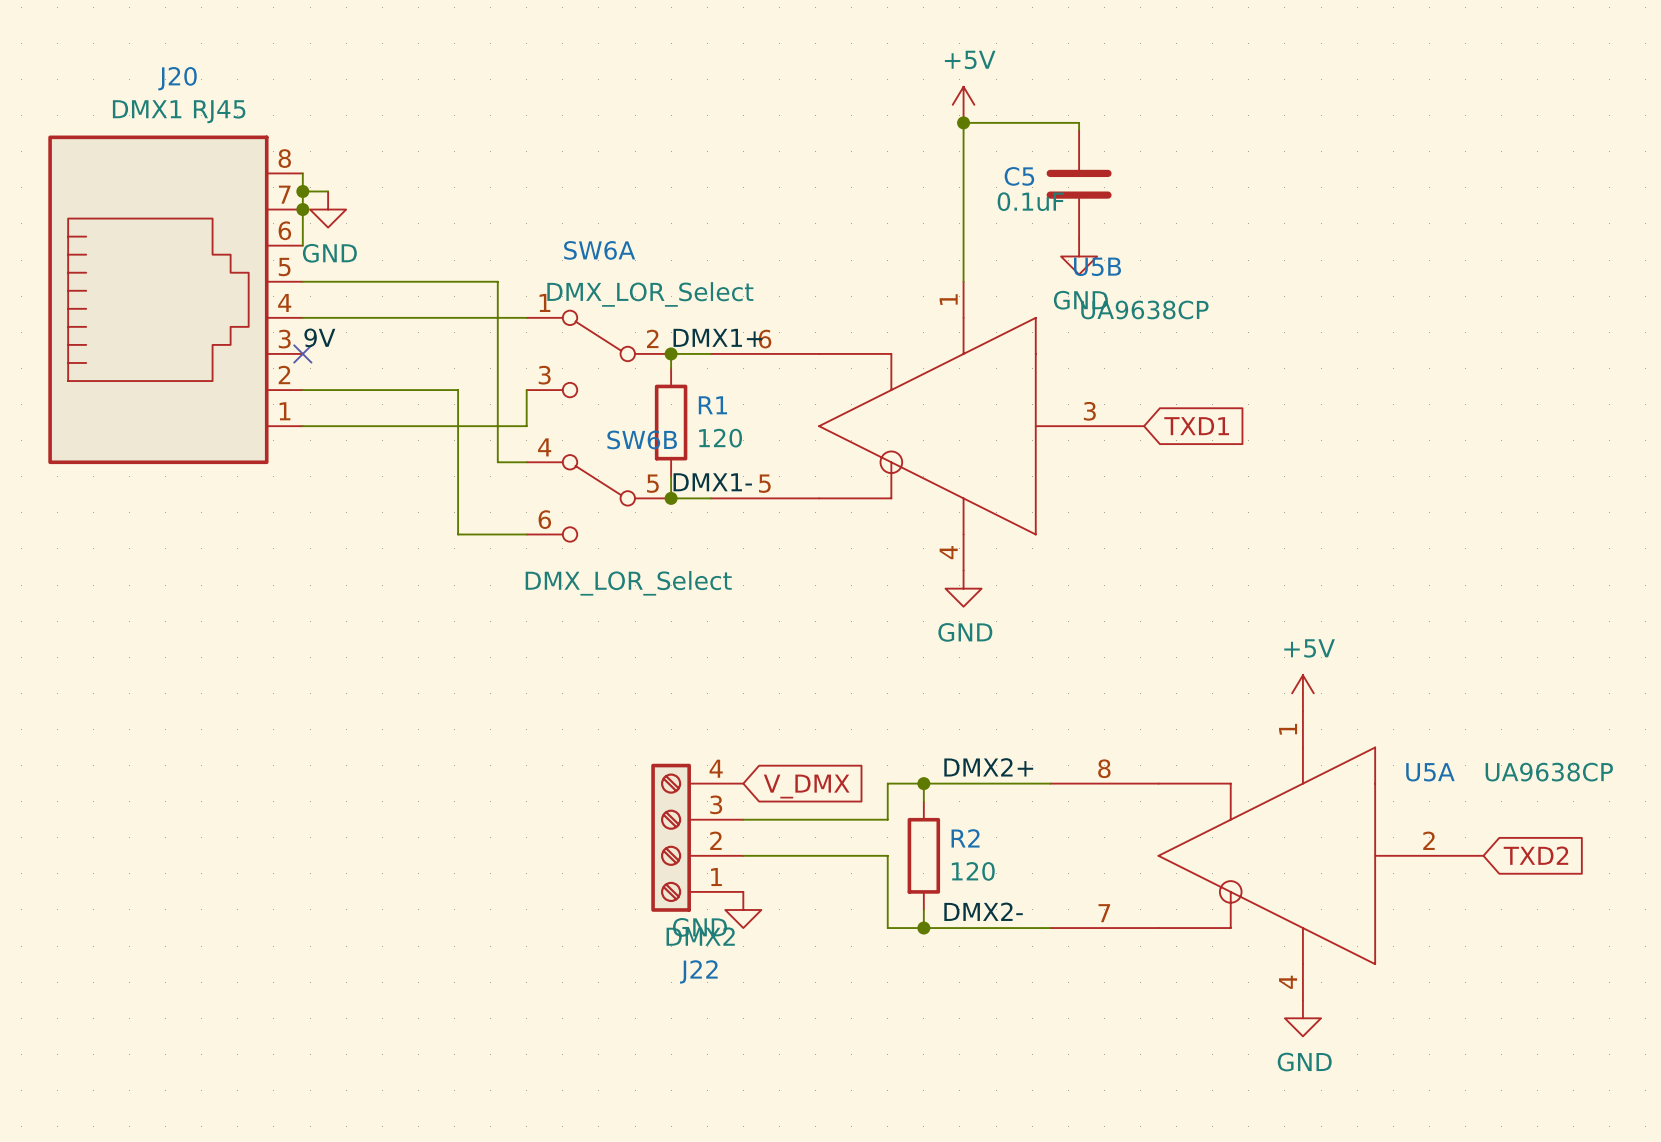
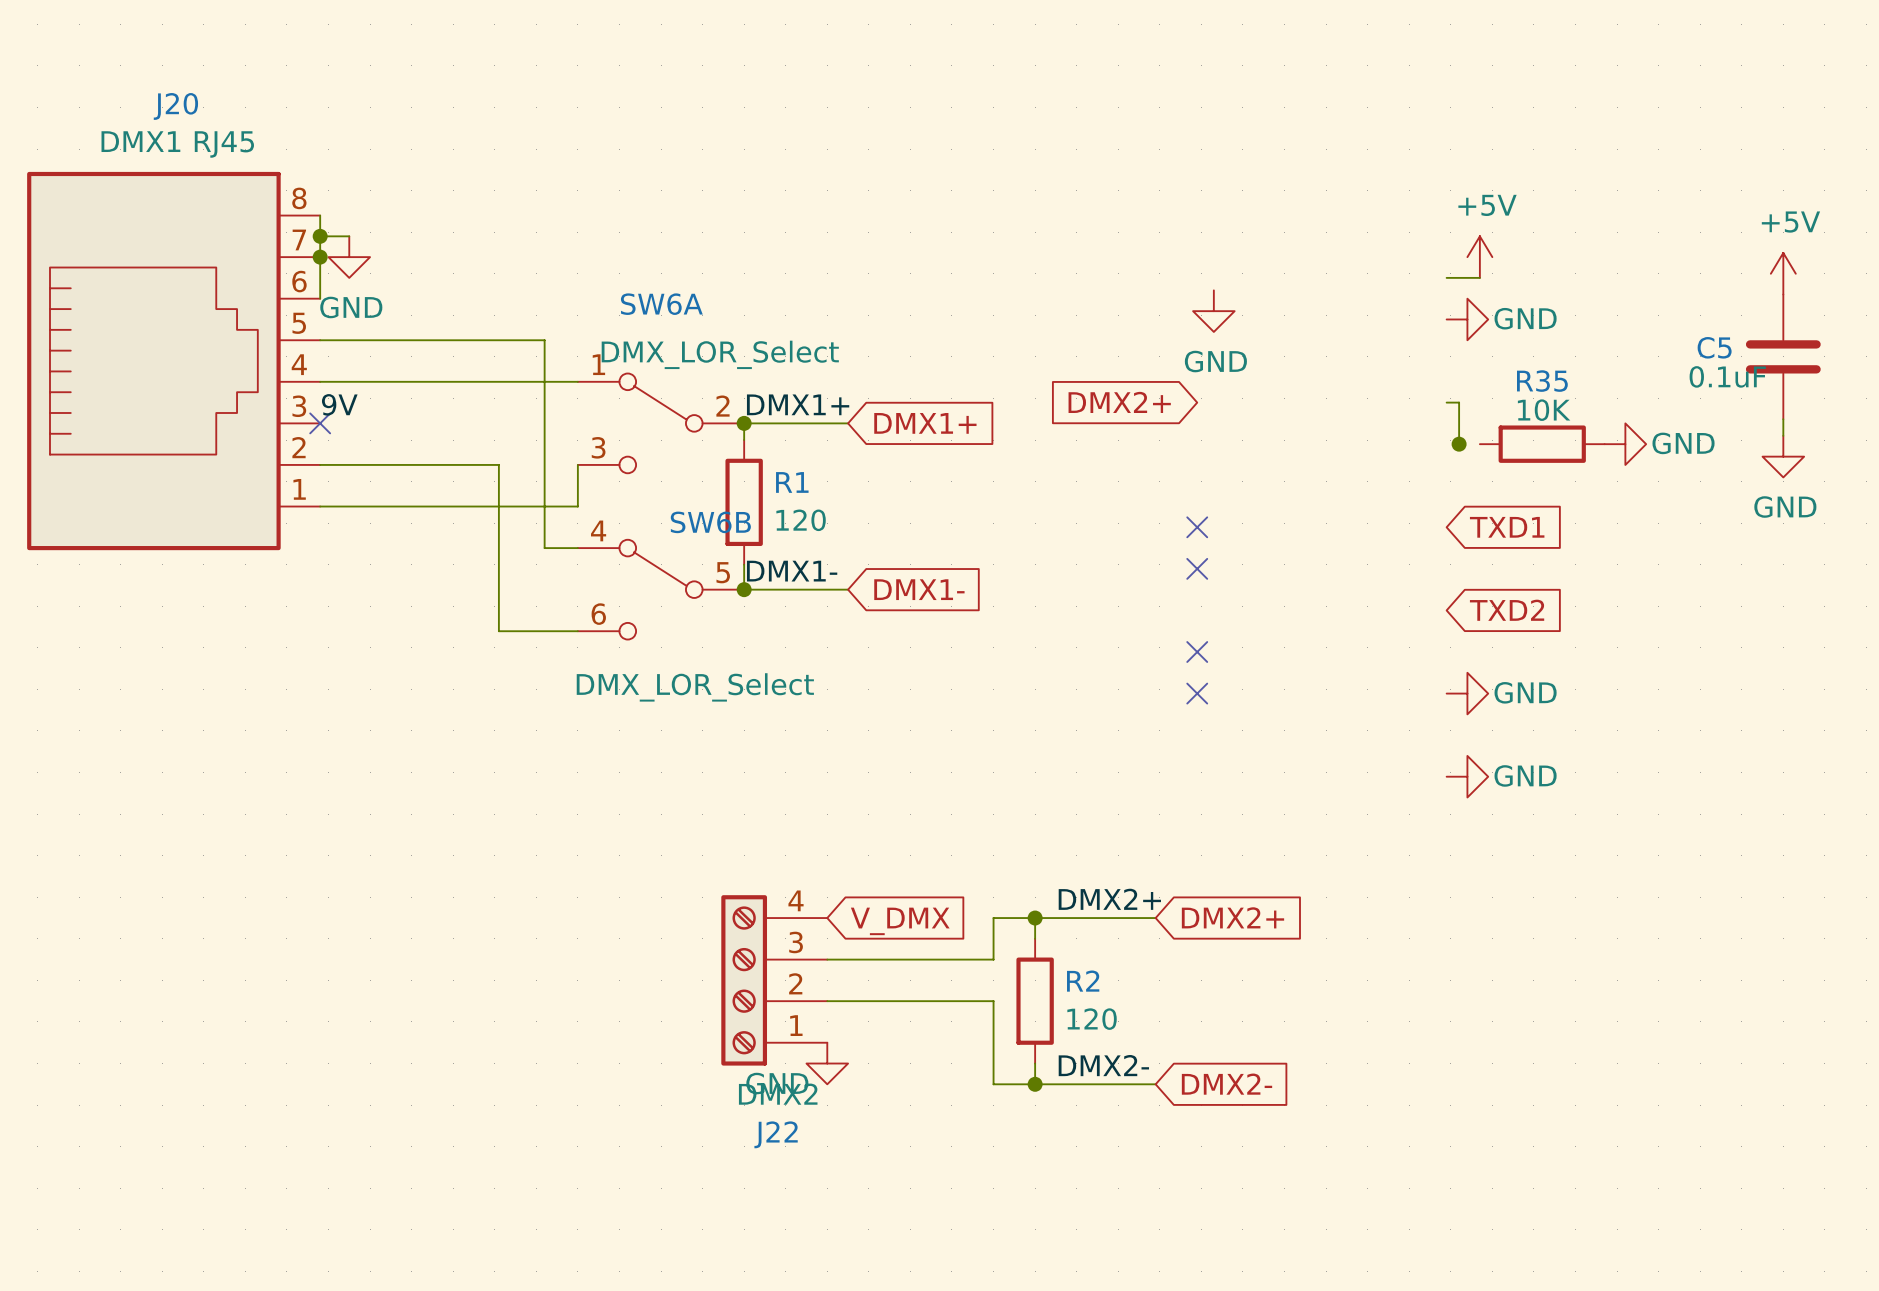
power symbol: +5V (963, 104) -> none
junction: (963, 122) -> none
wire: (1079, 130) (1079, 122) (963, 122) (963, 281) -> none
C5 position: (1079, 184) -> (1783, 356)
power symbol: none -> +5V (1479, 257)
power symbol: none -> +5V (1783, 273)
wire: none -> (1446, 277) (1479, 277)
power symbol: none -> GND (1467, 319)
global label: none -> DMX2+ (1119, 402)
wire: none -> (1446, 402) (1459, 402) (1459, 444)
wire: none -> (1783, 419) (1783, 435)
global label: none -> DMX1+ (925, 423)
junction: none -> (1459, 444)
R35: none -> 10K (1542, 444)
power symbol: none -> GND (1625, 444)
power symbol: none -> GND (1783, 456)
U5B: UA9638CP (927, 426) -> none
global label position: TXD1 (1196, 426) -> TXD1 (1507, 527)
no-connect mark: none -> (1197, 527)
no-connect mark: none -> (1197, 568)
global label: none -> DMX1- (919, 589)
global label: none -> TXD2 (1507, 610)
no-connect mark: none -> (1197, 652)
power symbol: GND (963, 588) -> none
no-connect mark: none -> (1197, 693)
power symbol: none -> GND (1467, 693)
power symbol: none -> GND (1467, 776)
power symbol: +5V (1302, 693) -> none
wire: (1028, 783) (1050, 783) -> none
global label: none -> DMX2+ (1232, 917)
U5A: UA9638CP (1266, 855) -> none
global label: TXD2 (1535, 855) -> none
global label: none -> DMX2- (1227, 1084)
wire: (1028, 928) (1050, 928) -> none
power symbol: GND (1302, 1018) -> none

